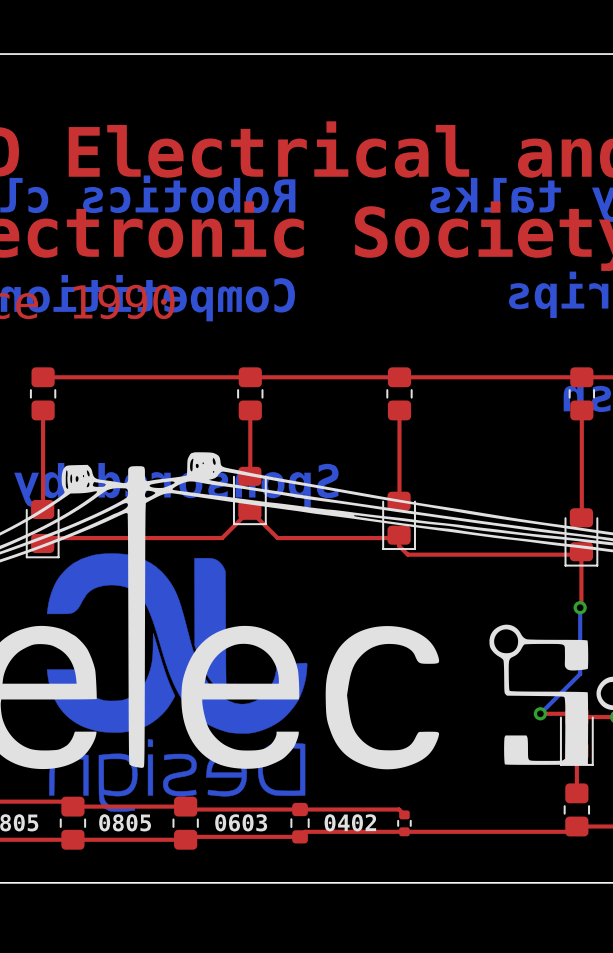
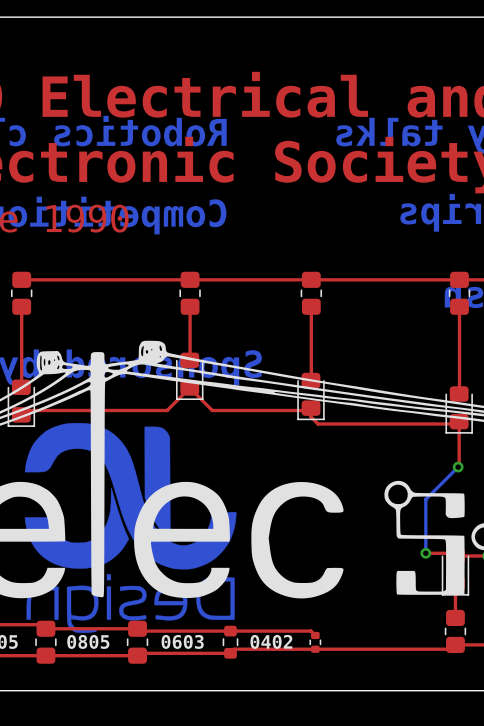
bottom track: (580, 607) (580, 674) (540, 713) -> (458, 467) (425, 499) (425, 553)

